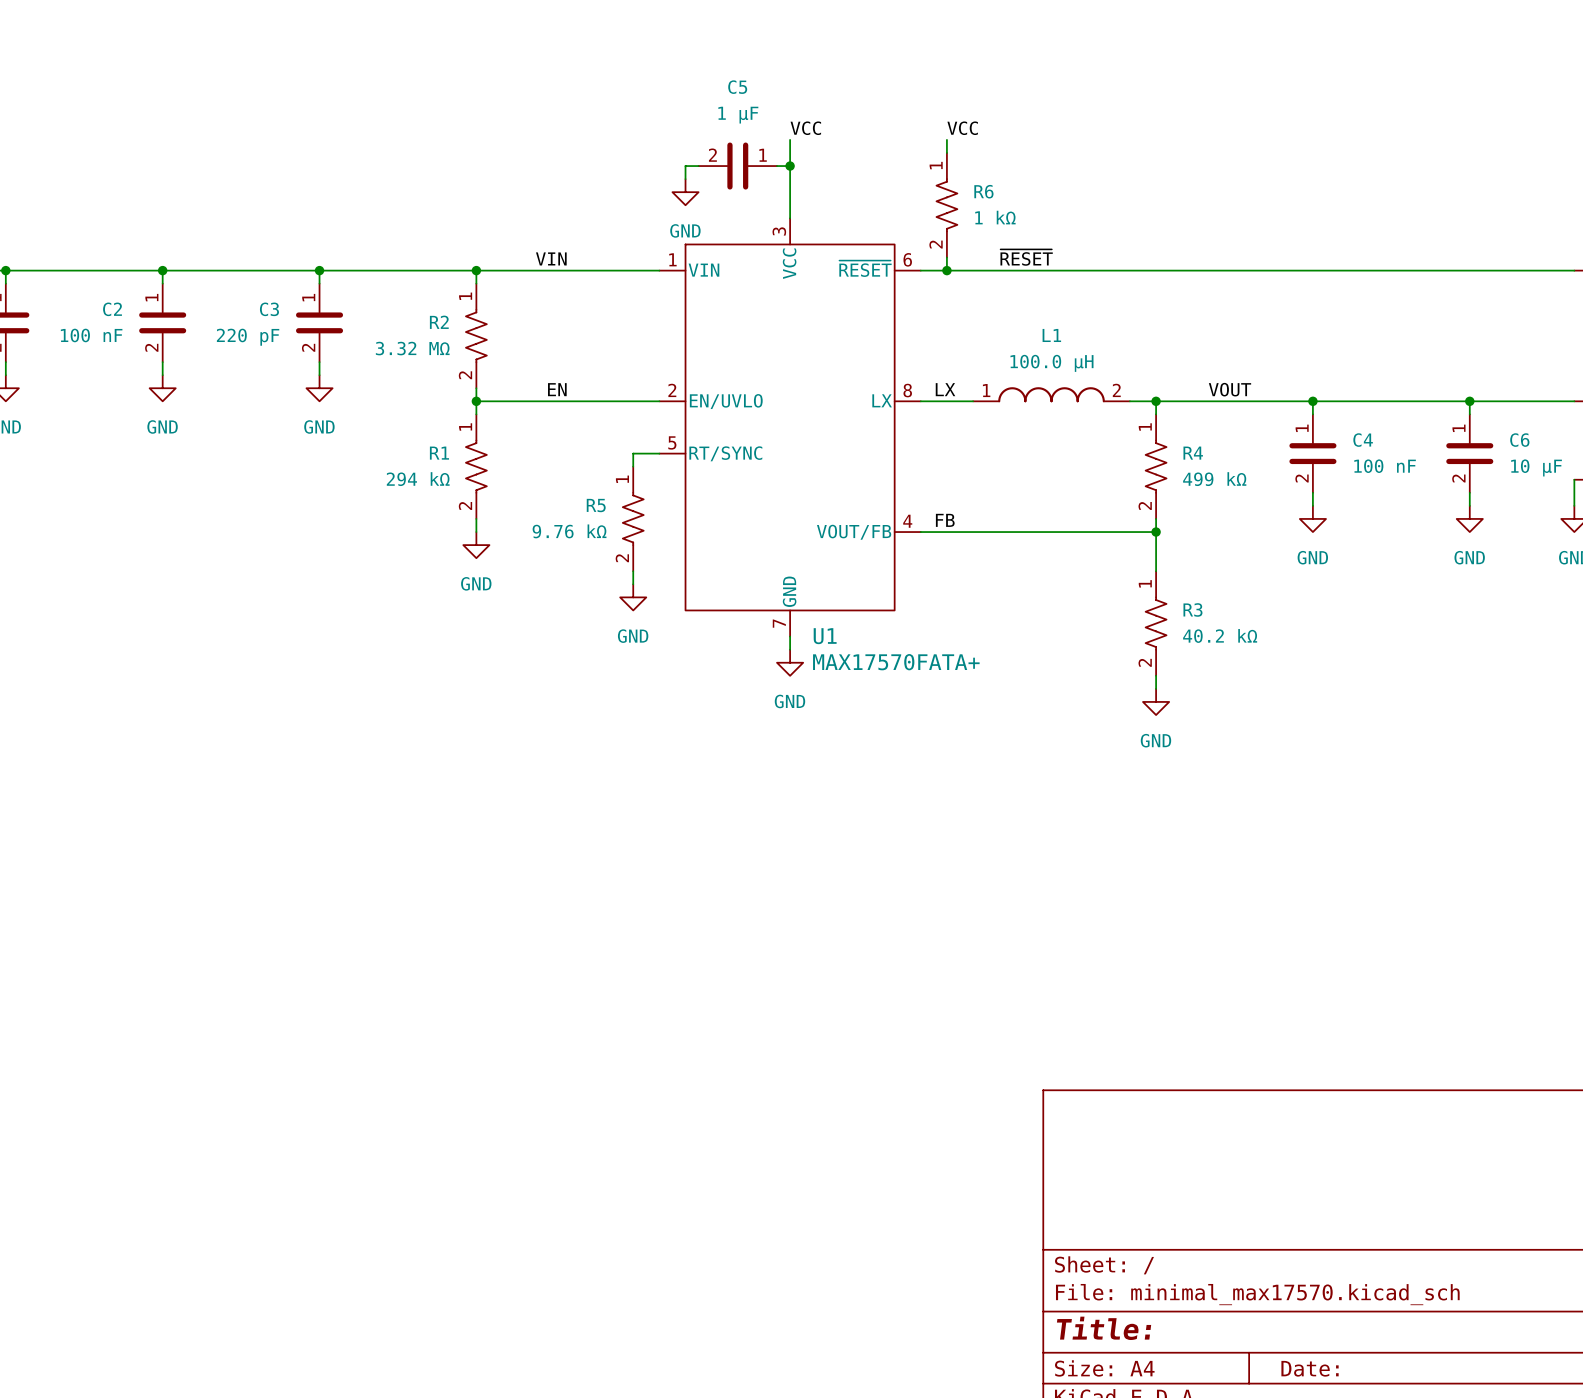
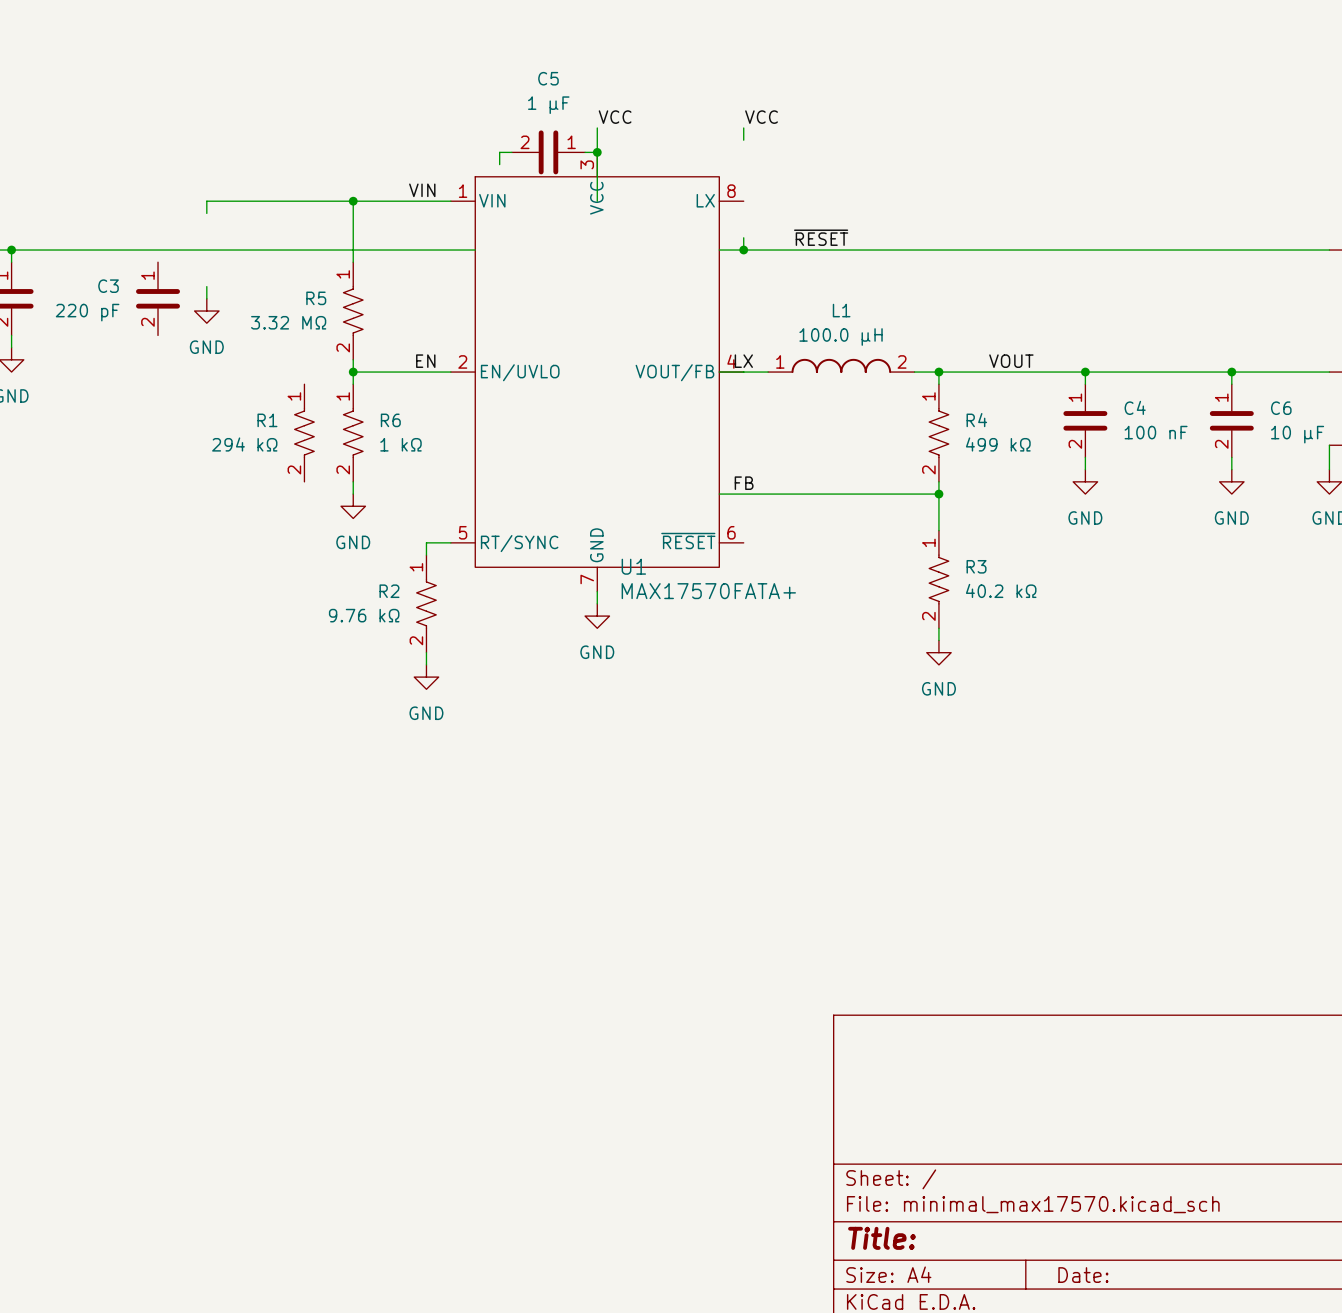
power symbol: GND (685, 192) -> none
R6 position: (946, 205) -> (353, 433)
wire: none -> (353, 201) (353, 262)
junction: none -> (353, 201)
wire: none -> (450, 201) (206, 201) (206, 213)
U1 symbol: [659, 218, 921, 637] -> [450, 152, 744, 592]
label position: VIN (551, 258) -> VIN (422, 190)
wire: (319, 270) (319, 283) -> (206, 286) (206, 298)
junction: (319, 270) -> none
wire: (476, 270) (476, 283) -> none
junction: (476, 270) -> none
R2 flip: as is (476, 335) -> left-right (426, 603)
R2 position: (476, 335) -> (426, 603)
R2 value: 3.32 MΩ (412, 348) -> 9.76 kΩ (364, 615)
wire: (319, 362) (319, 375) -> none
power symbol position: GND (319, 388) -> GND (206, 311)
wire: (476, 388) (476, 414) -> (353, 359) (353, 384)
label position: EN (557, 389) -> EN (425, 361)
wire: (476, 401) (528, 401) -> none
junction position: (476, 401) -> (353, 372)
wire: (659, 453) (633, 453) (633, 466) -> none
wire: (476, 518) (476, 532) -> (353, 481) (353, 494)
R5 flip: as is (633, 518) -> left-right (353, 311)
R5 position: (633, 518) -> (353, 311)
R5 value: 9.76 kΩ (569, 531) -> 3.32 MΩ (288, 322)
power symbol position: GND (476, 545) -> GND (353, 506)
wire: (633, 571) (633, 584) -> (426, 555) (426, 542) (450, 542)
power symbol: GND (633, 597) -> none
wire: none -> (426, 652) (426, 664)
power symbol: none -> GND (426, 677)

